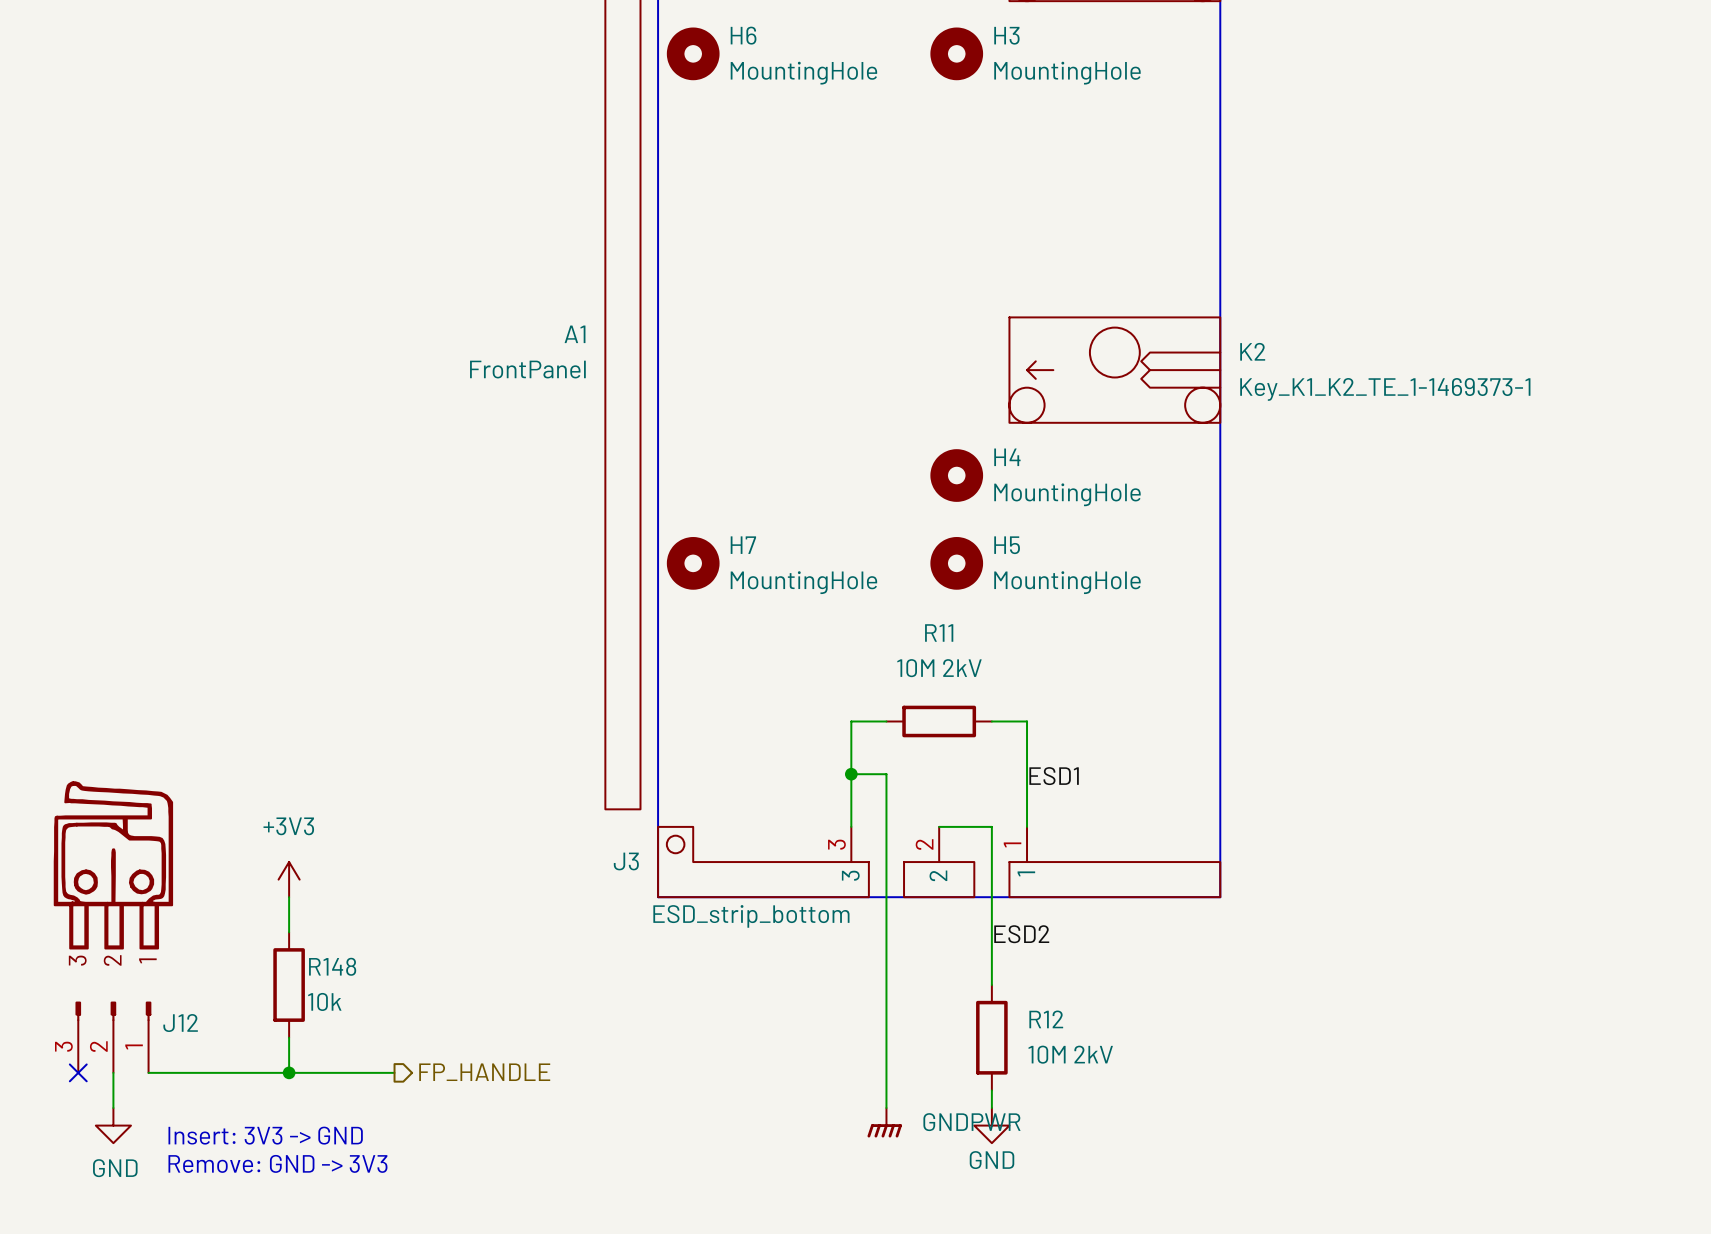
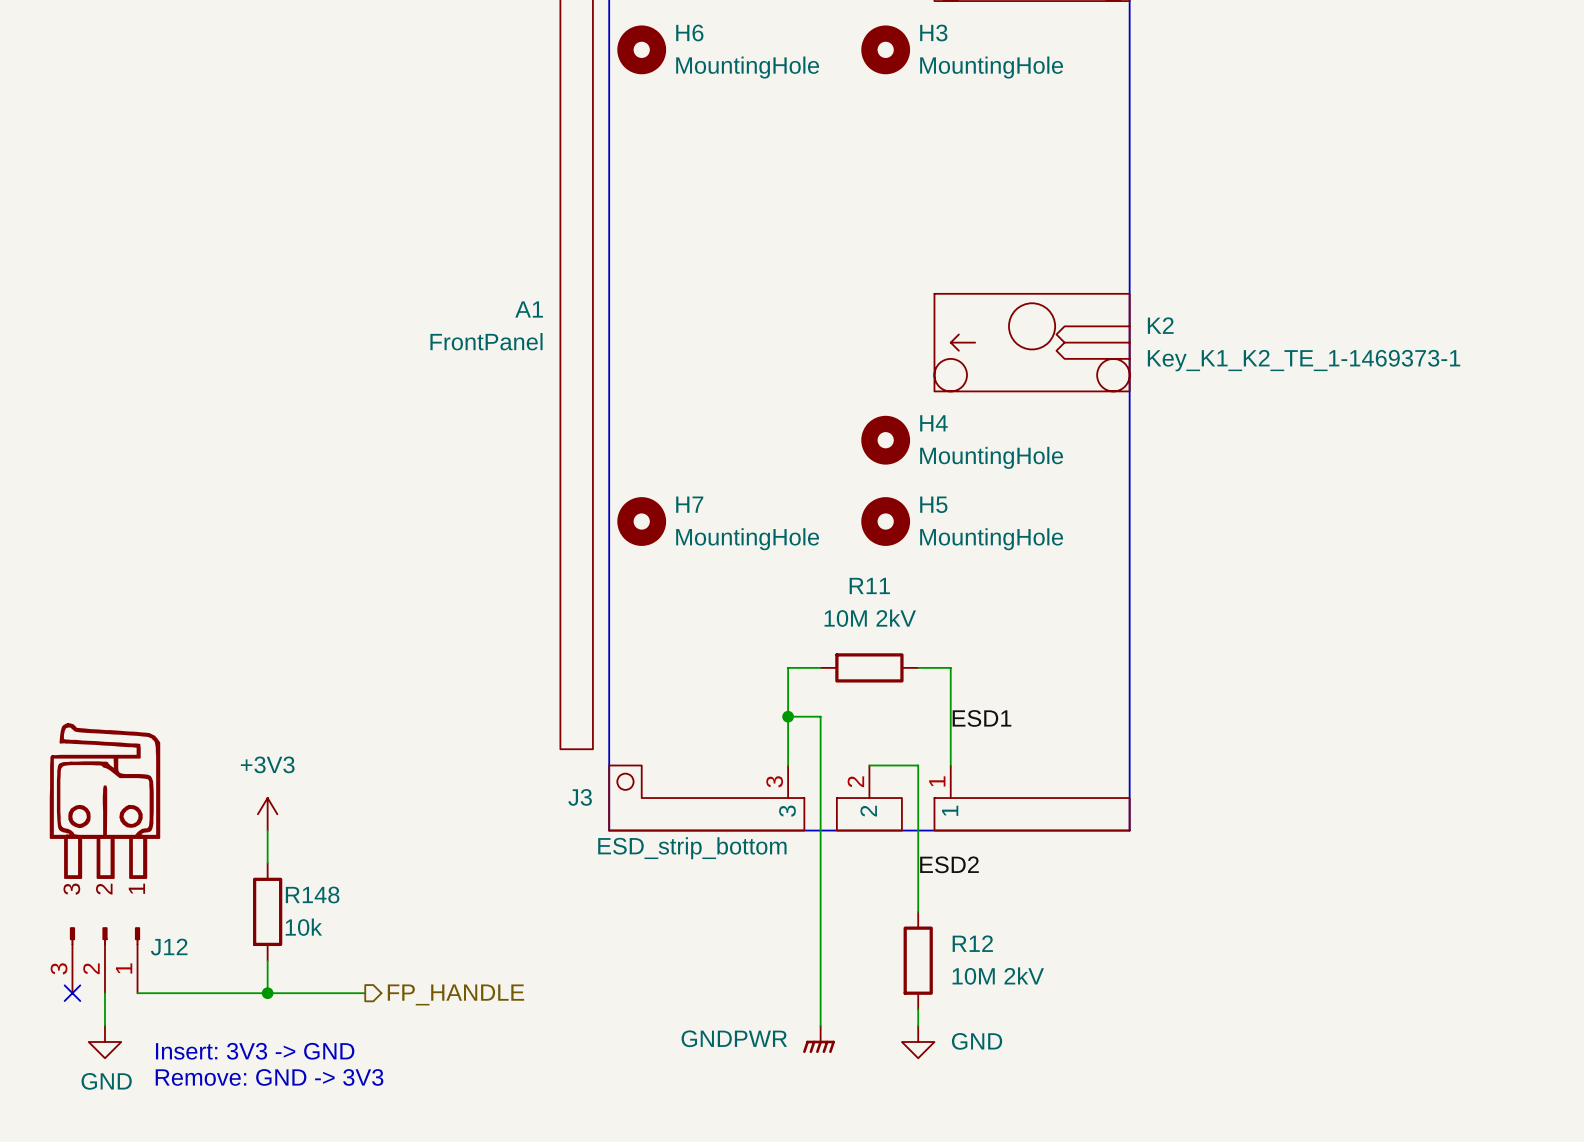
power symbol text position: GNDPWR (971, 1122) -> GNDPWR (734, 1038)
power symbol text position: GND (992, 1160) -> GND (977, 1041)

